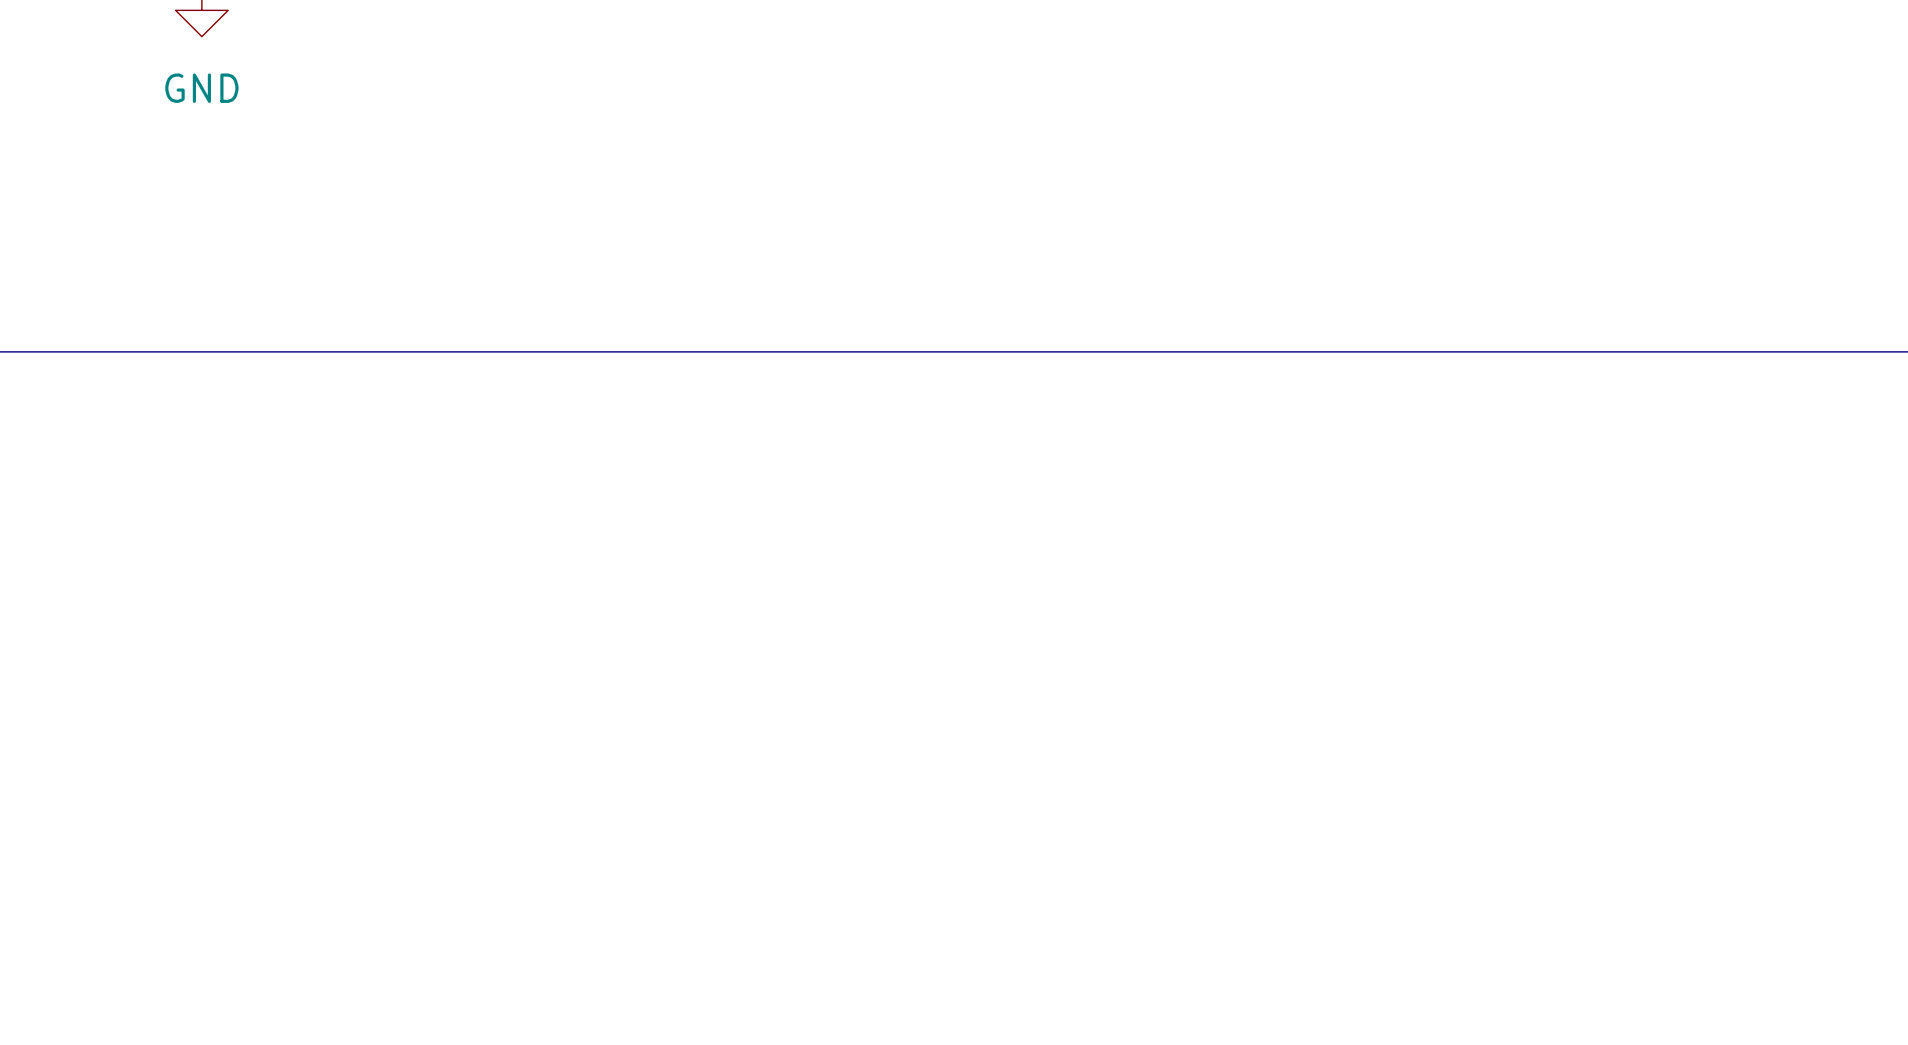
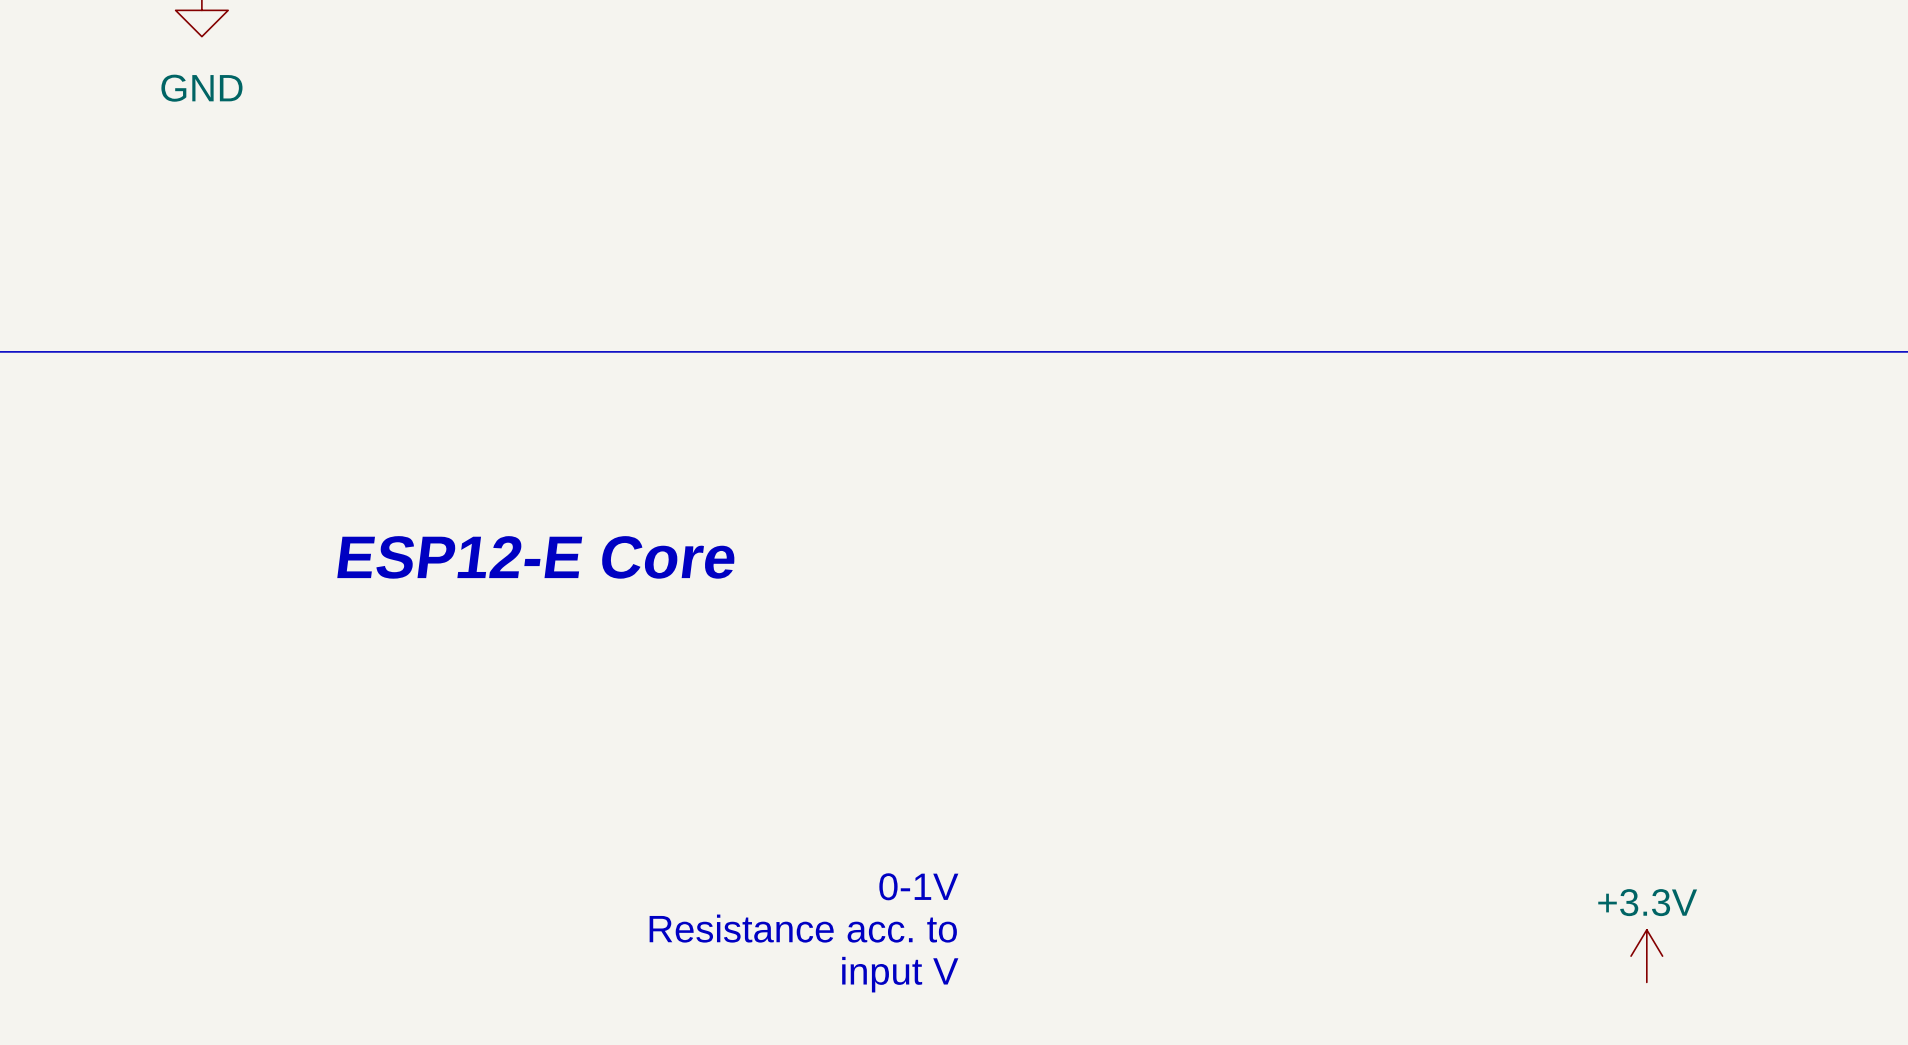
text: none -> ESP12-E Core (536, 557)
text: none -> 0-1V (918, 886)
text: none -> Resistance acc. to (803, 928)
power symbol: none -> +3.3V (1646, 956)
text: none -> input V (900, 974)

